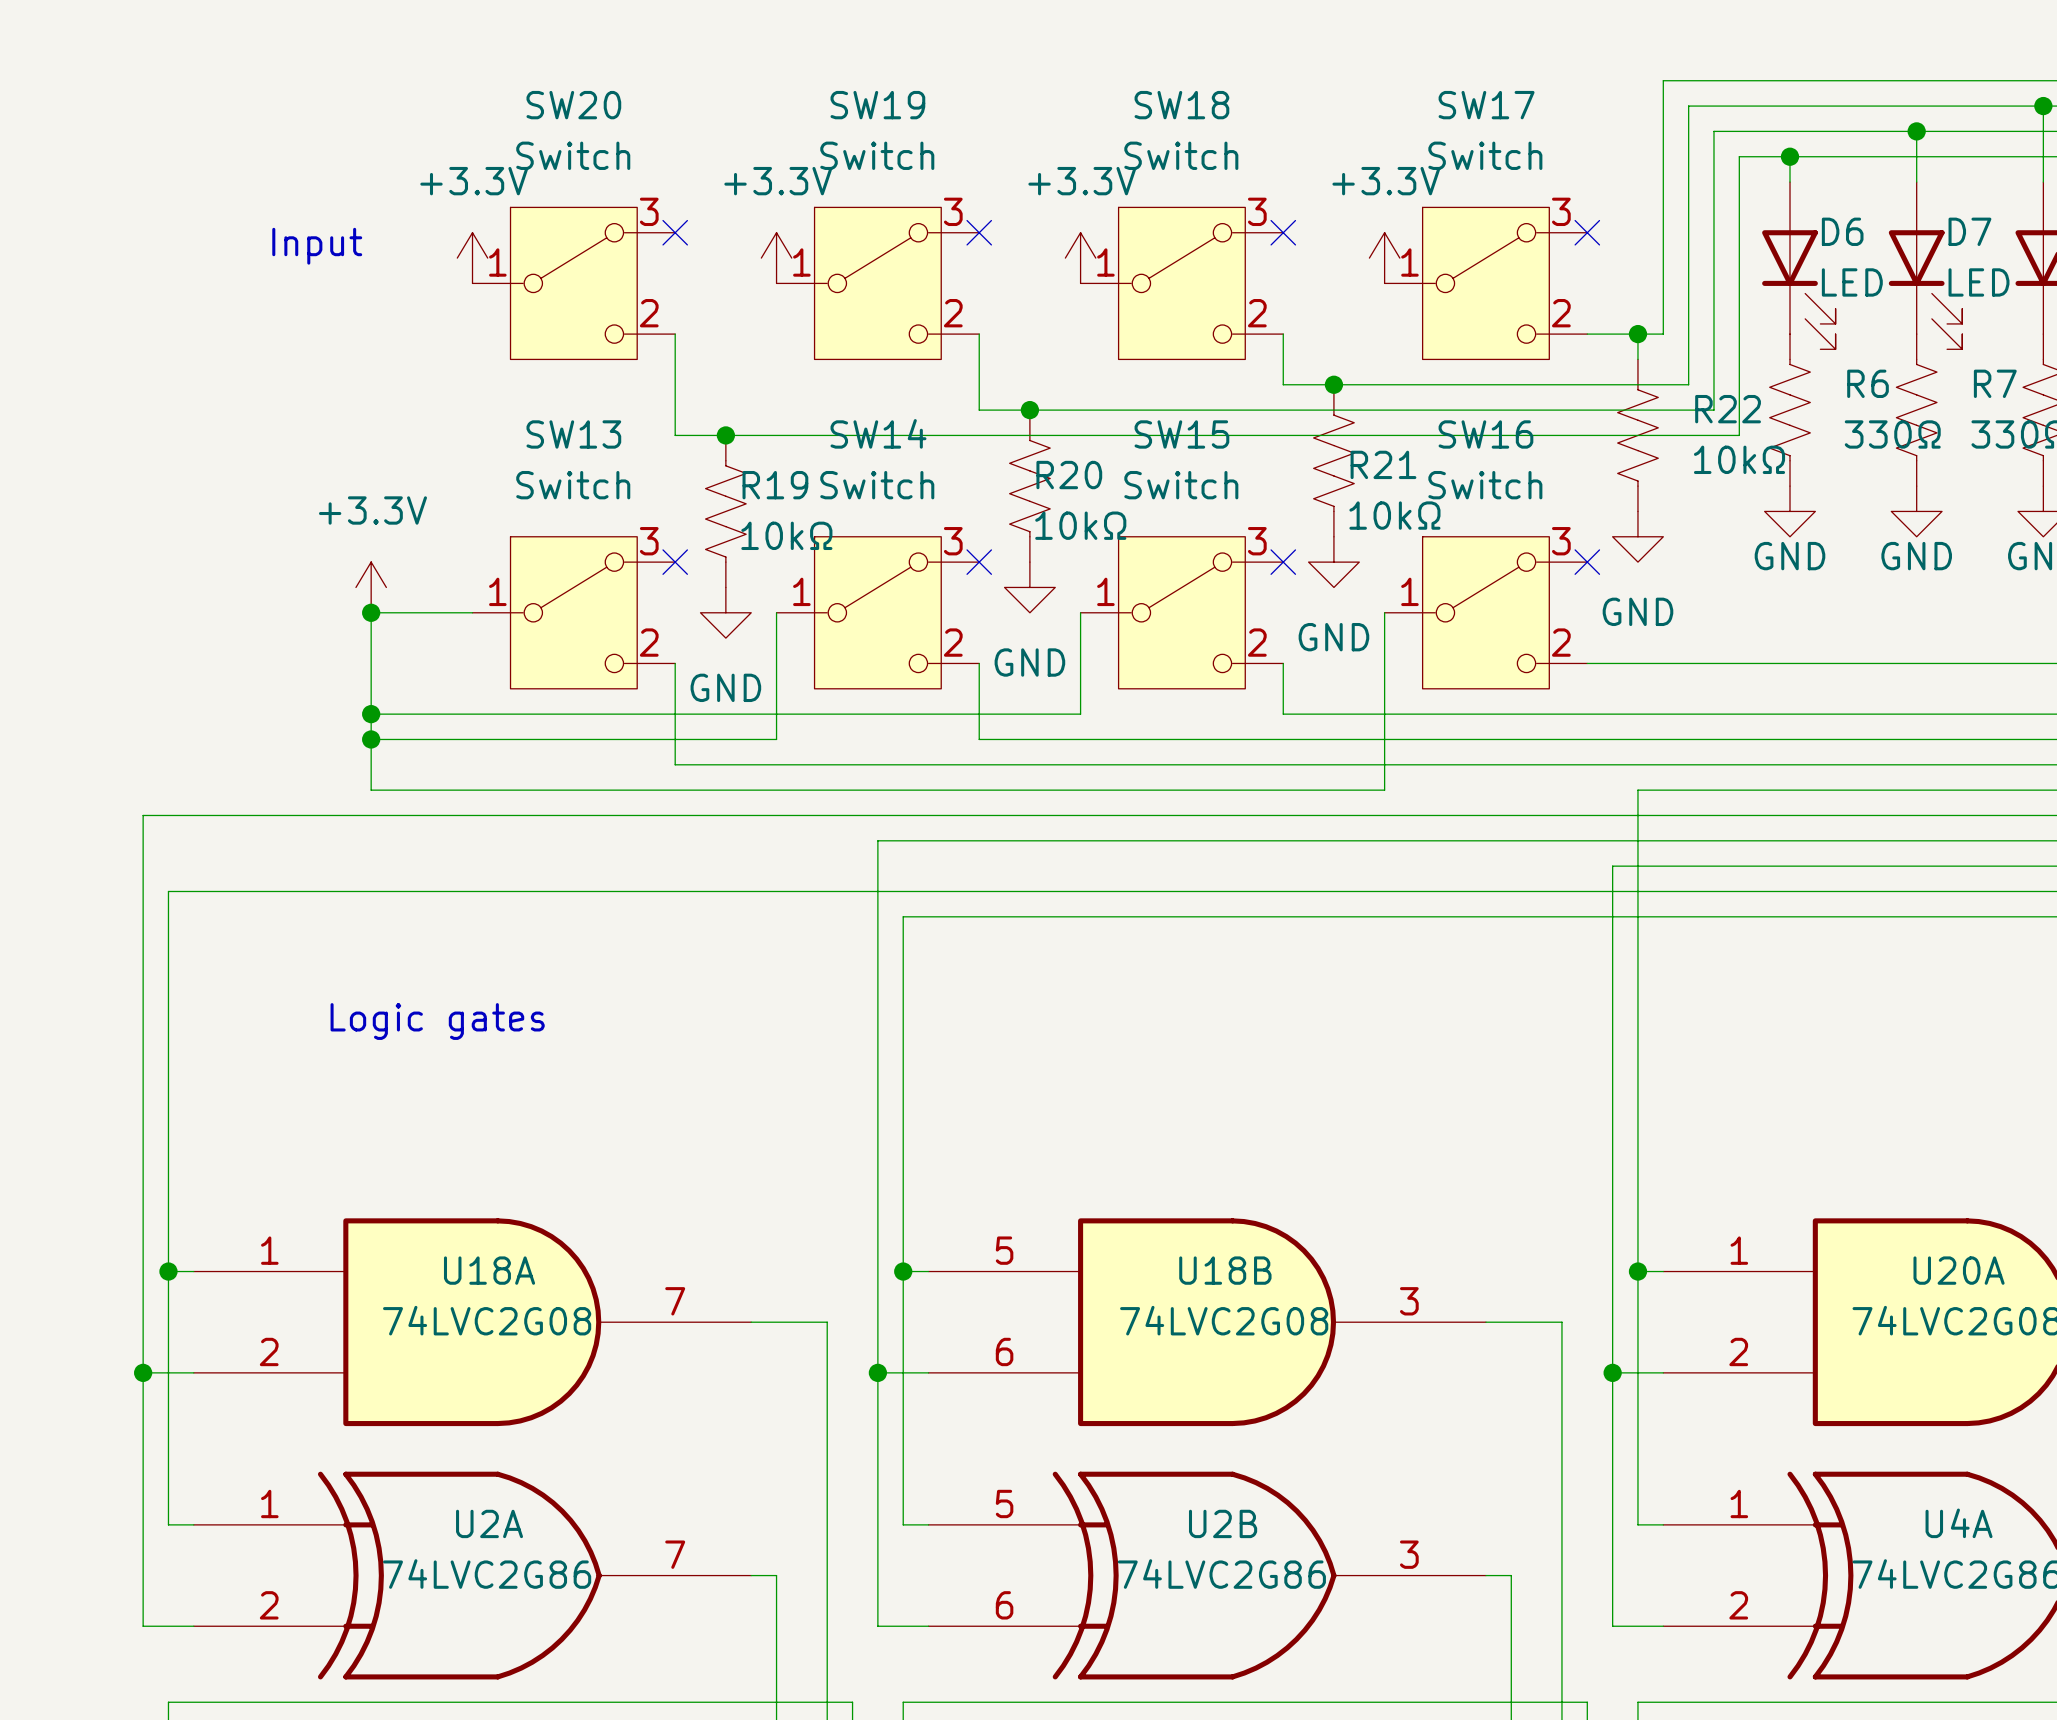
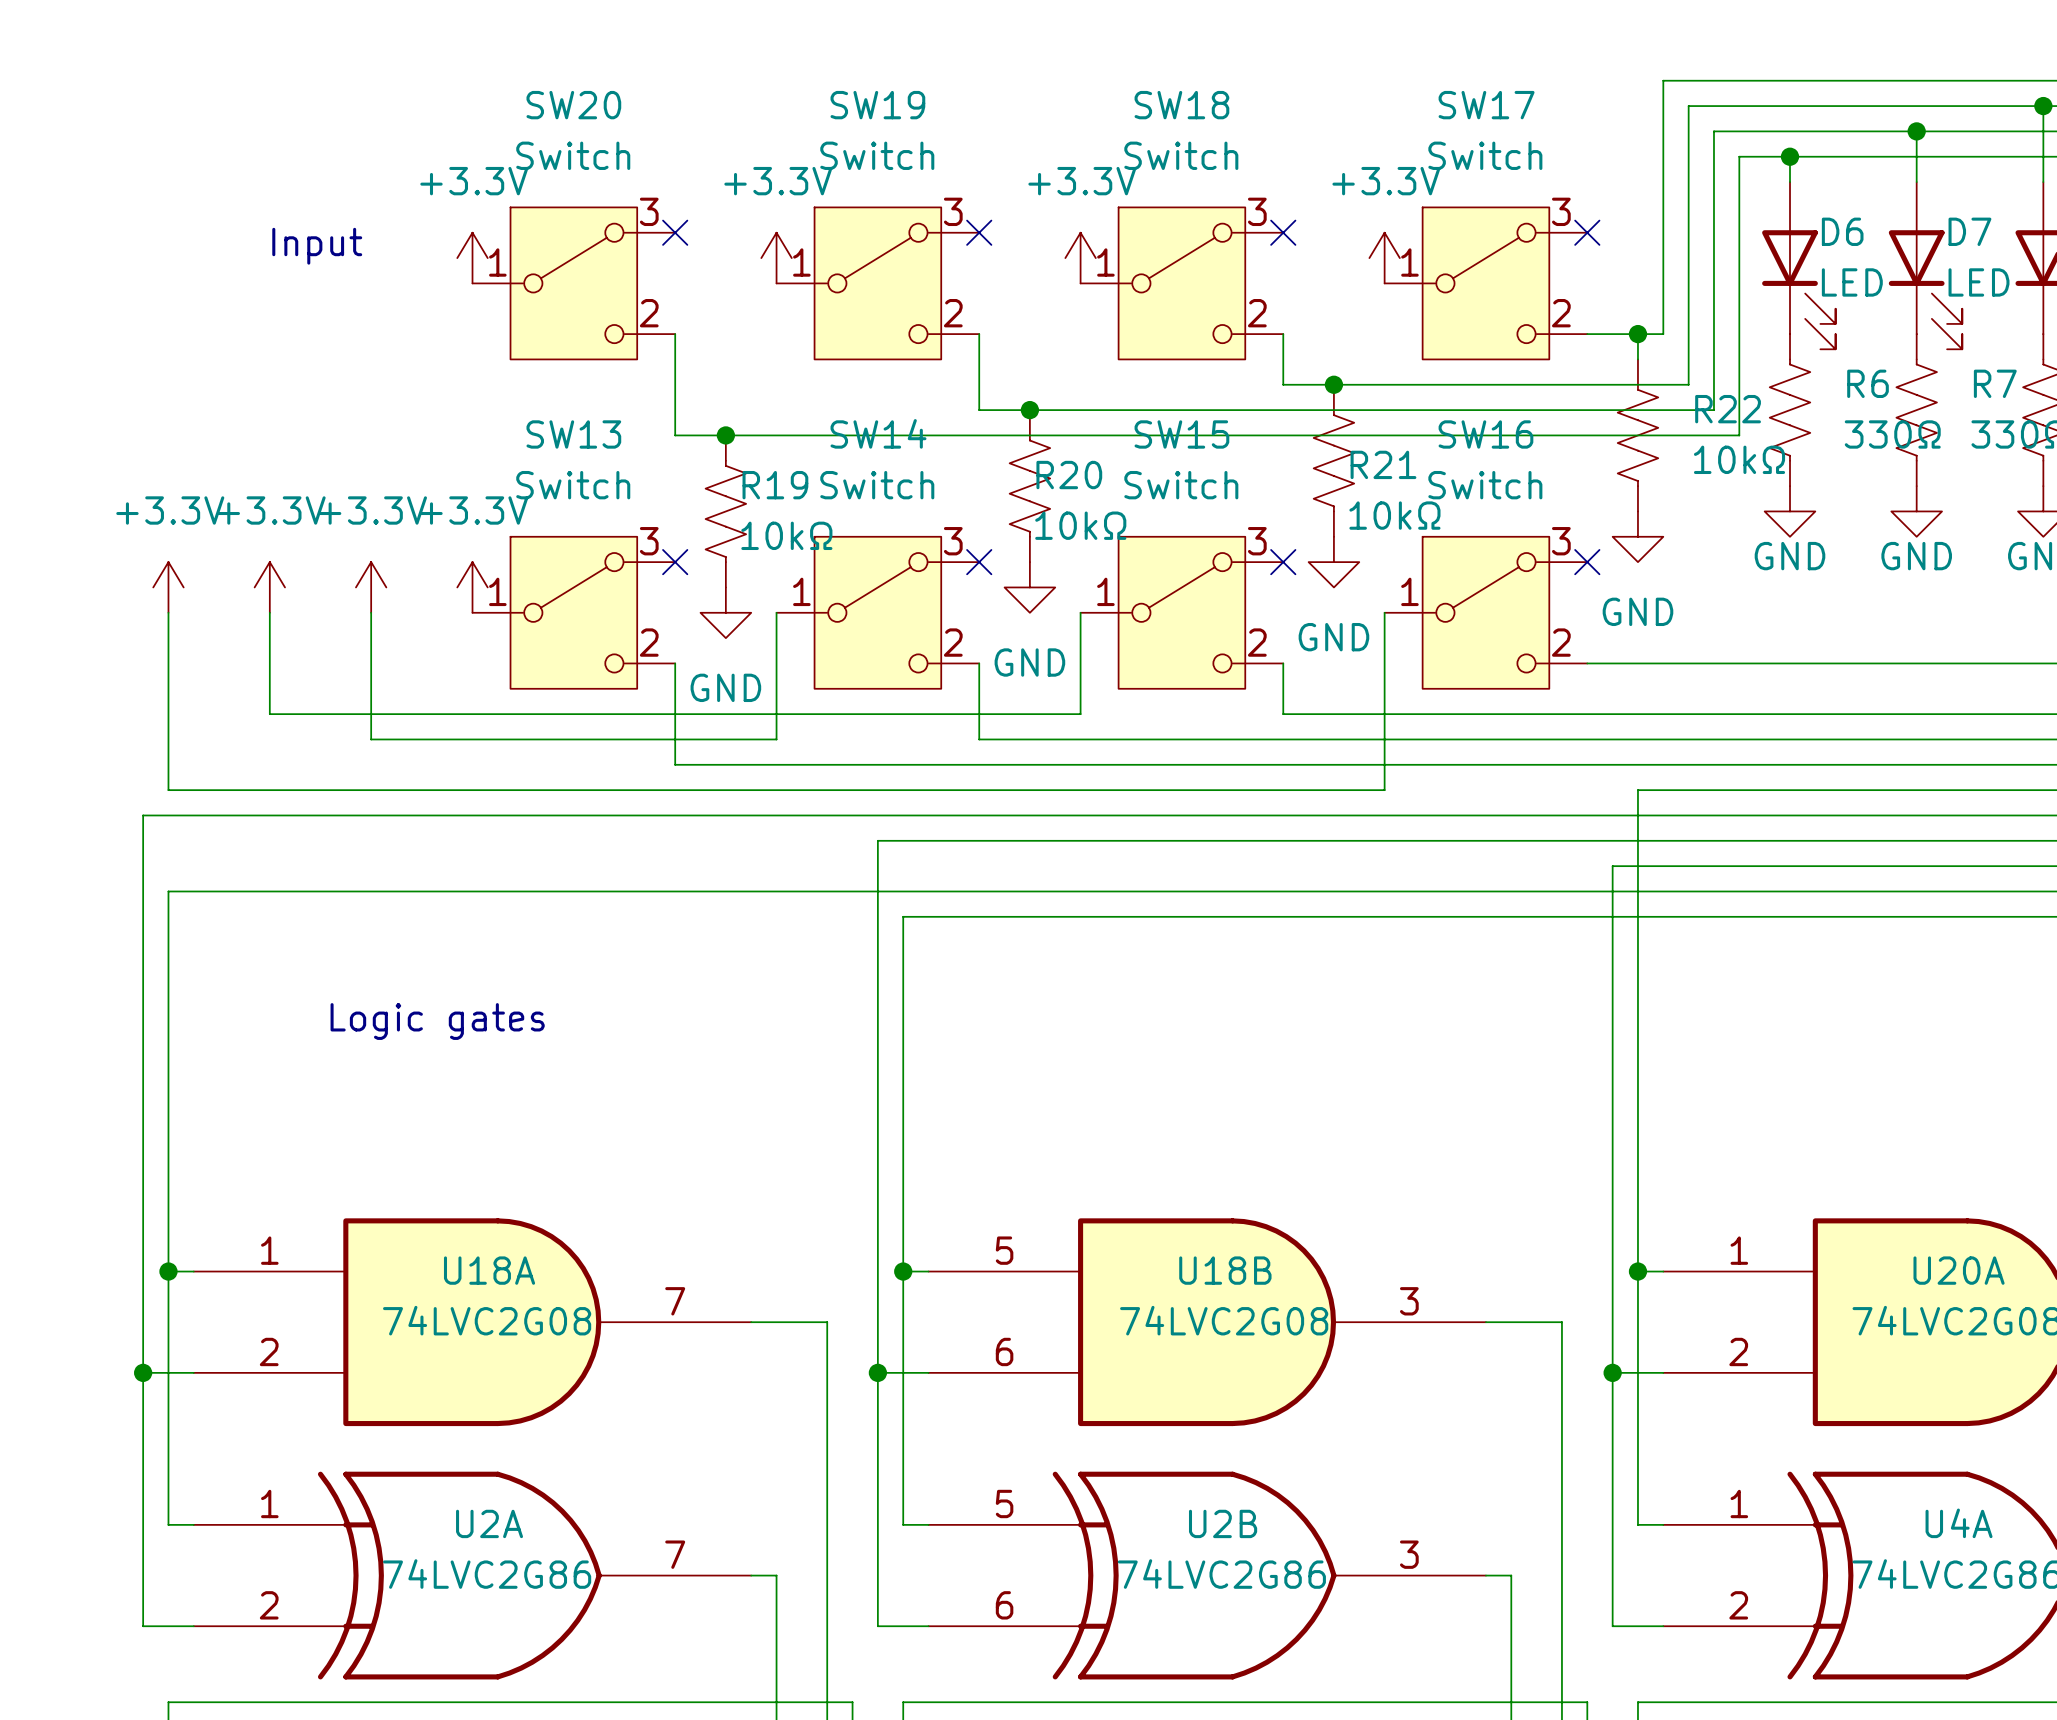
power symbol: none -> +3.3V (168, 587)
power symbol: none -> +3.3V (269, 587)
power symbol: none -> +3.3V (472, 587)
wire: none -> (269, 612) (269, 714) (371, 714)
wire: (371, 612) (472, 612) -> none
junction: (371, 612) -> none
junction: (371, 714) -> none
wire: (371, 739) (371, 790) -> (168, 612) (168, 790) (371, 790)
junction: (371, 739) -> none

